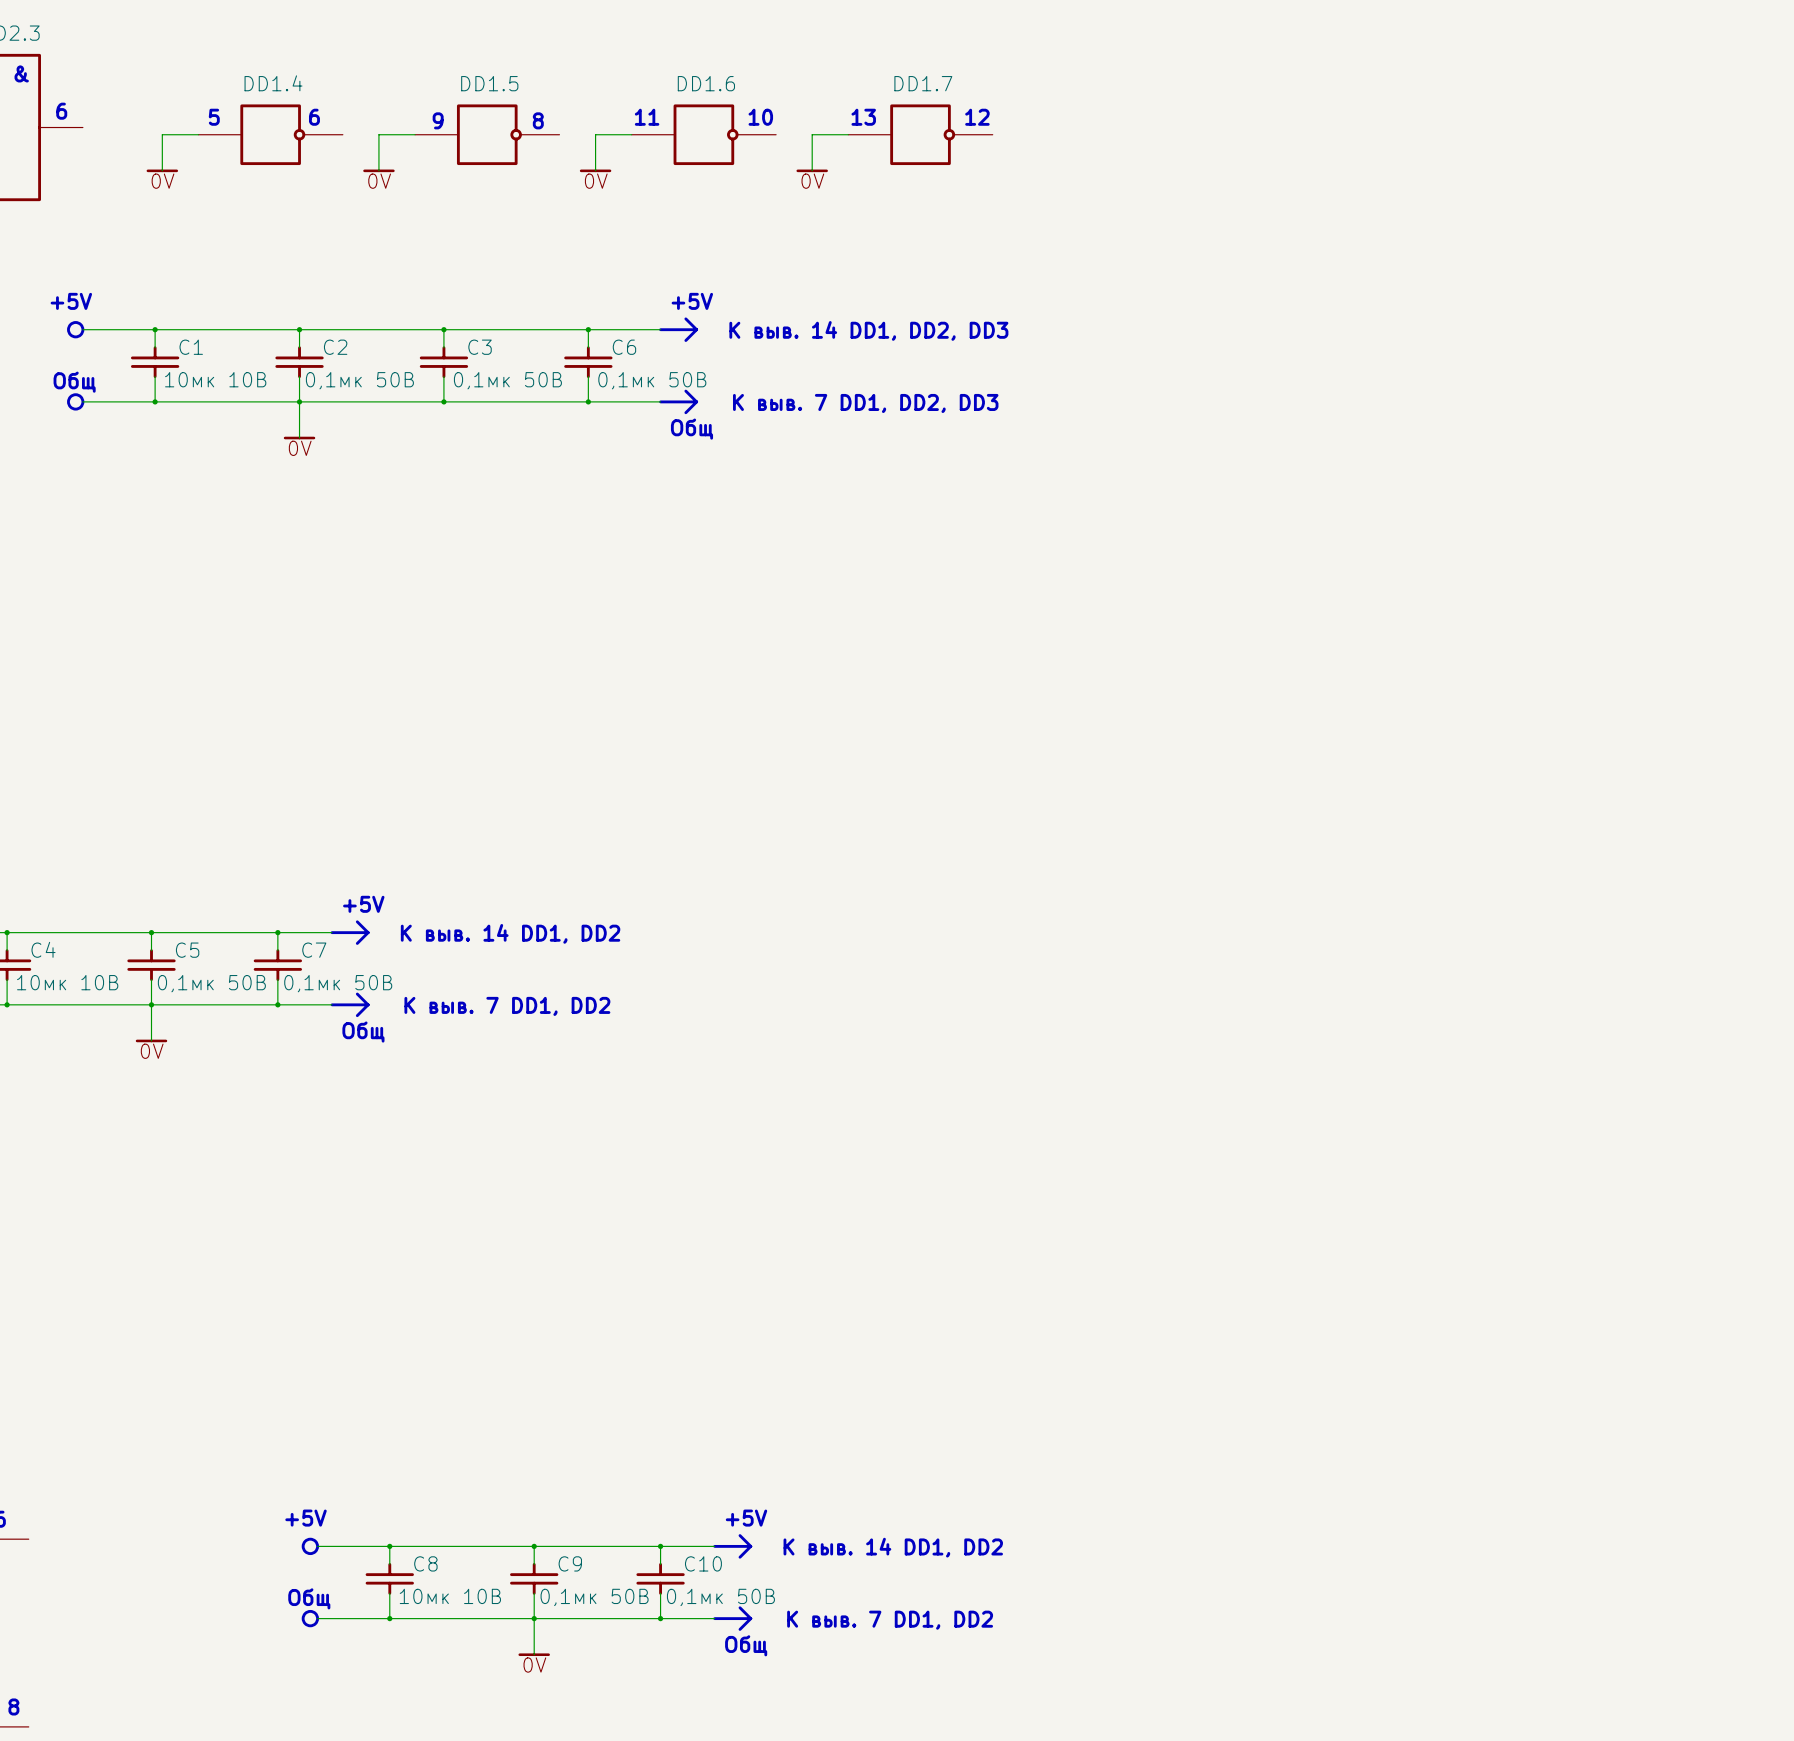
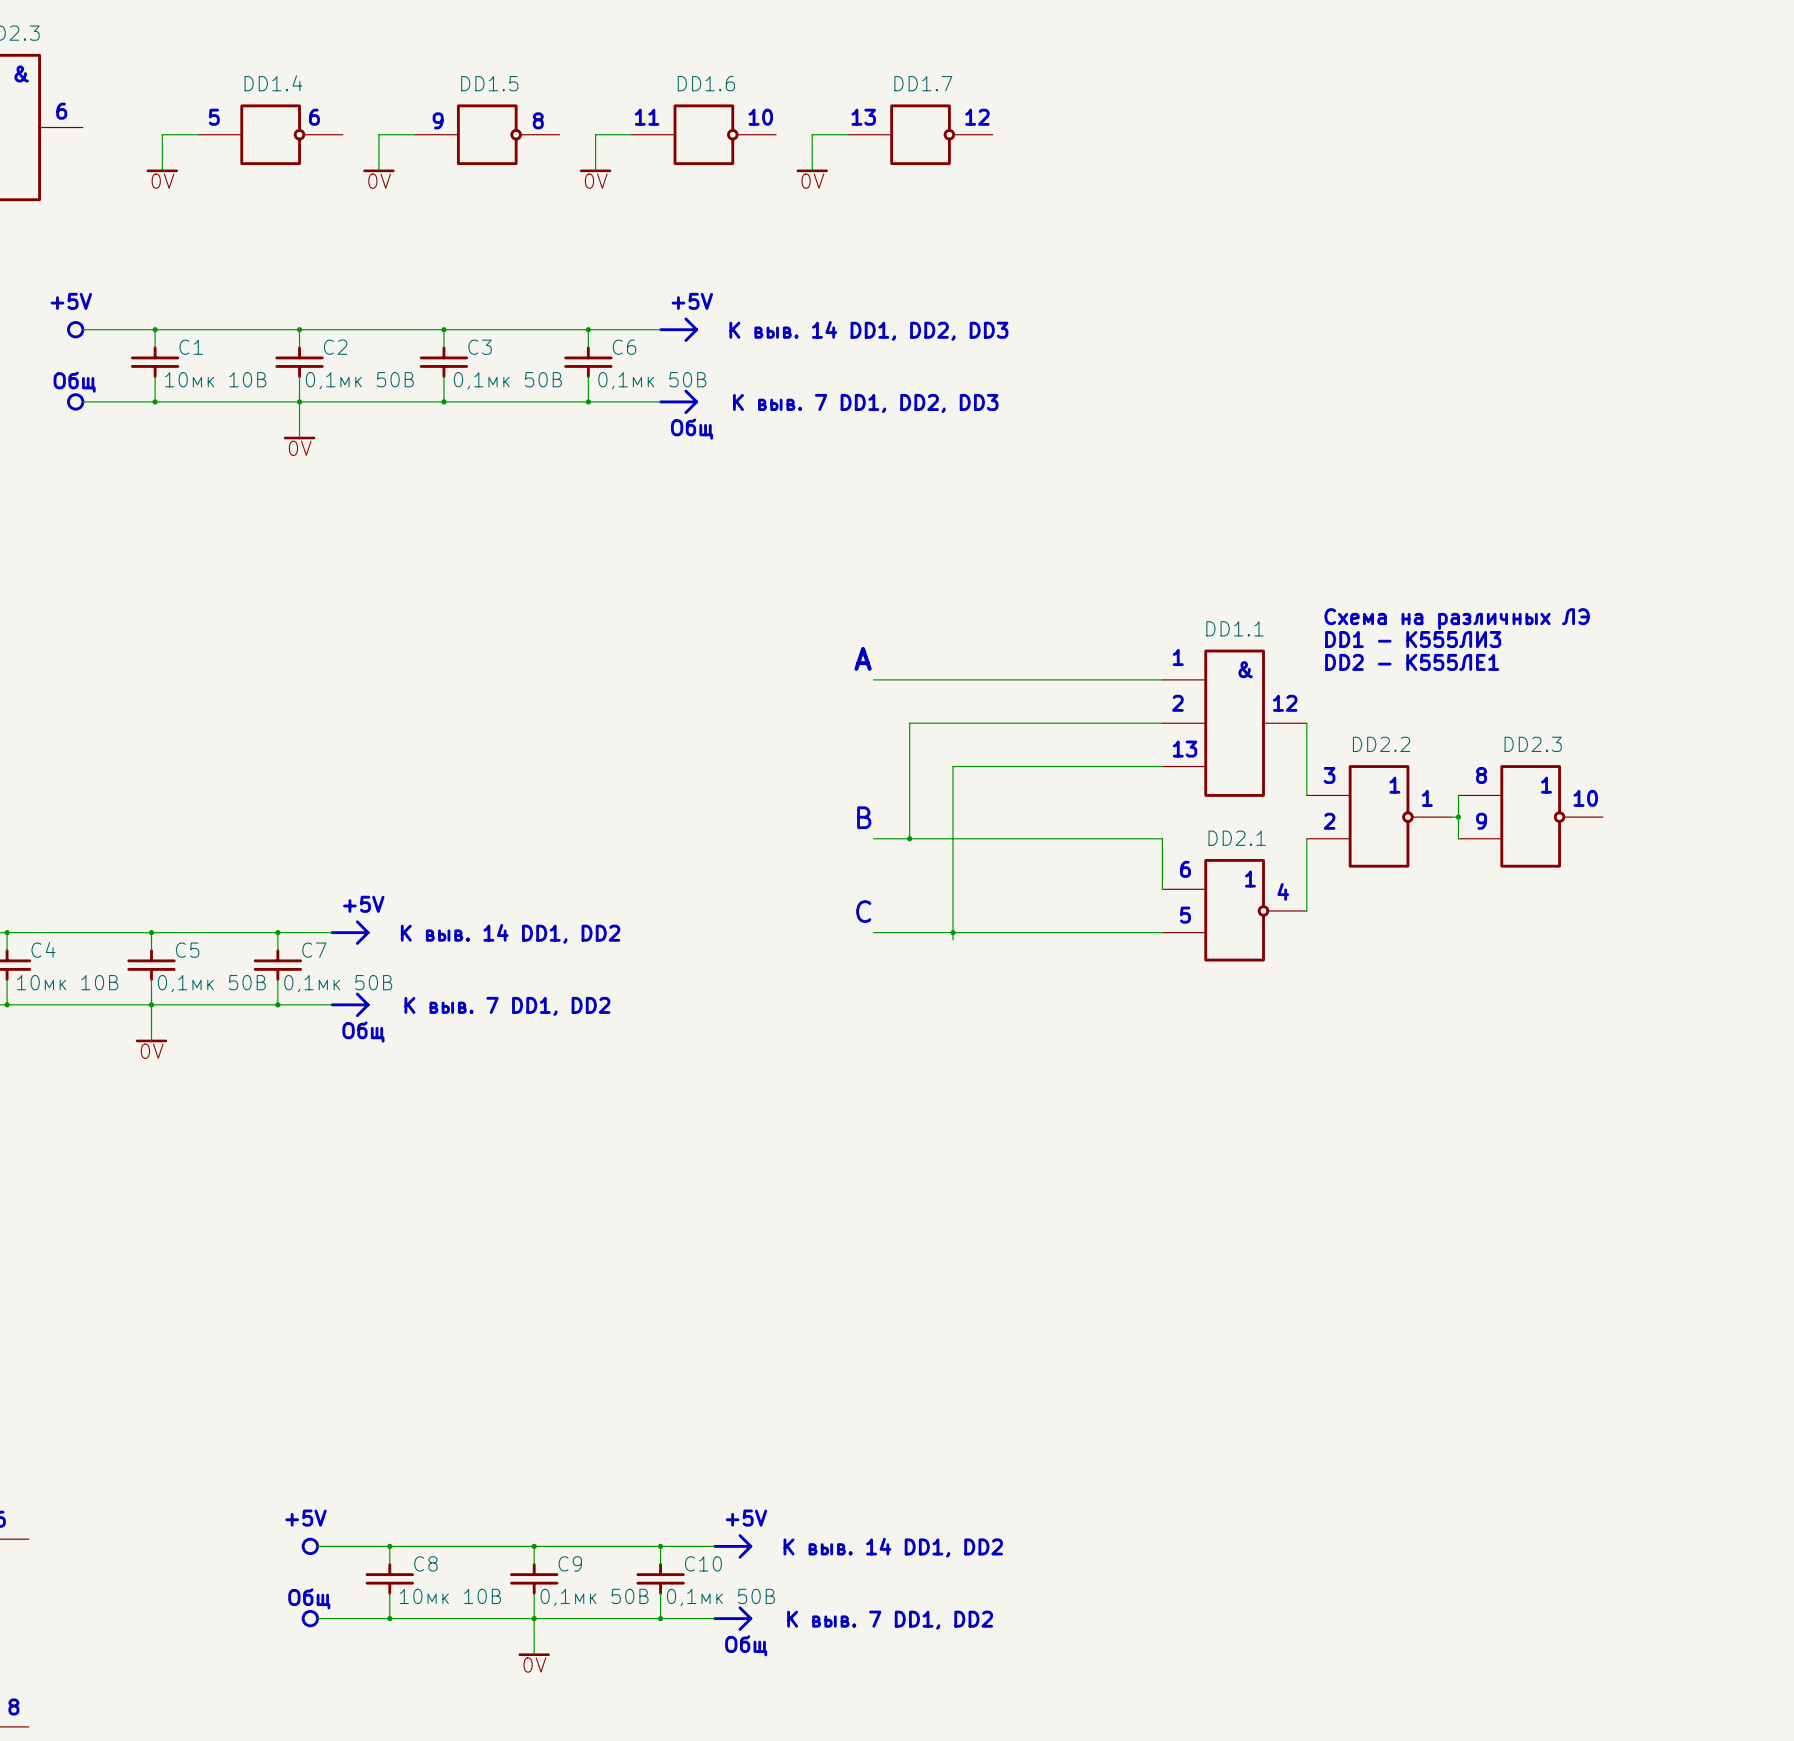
text: none -> Схема на различных ЛЭ (1457, 619)
text: none -> DD1 - К555ЛИ3 (1413, 639)
text: none -> 1 (1178, 657)
text: none -> A (863, 658)
text: none -> DD2 - К555ЛЕ1 (1412, 662)
text: none -> & (1245, 669)
wire: none -> (873, 679) (1162, 679)
text: none -> 2 12 (1234, 703)
wire: none -> (1162, 723) (909, 723) (909, 838)
DD1.1: none -> (1234, 723)
wire: none -> (1306, 723) (1306, 795)
text: none -> 13 (1185, 749)
wire: none -> (1162, 766) (953, 766) (953, 939)
text: none -> 3 (1329, 775)
text: none -> 8 (1481, 775)
text: none -> 1 (1394, 785)
text: none -> 1 (1546, 785)
wire: none -> (1458, 795) (1458, 838)
text: none -> 1 (1427, 798)
text: none -> 10 (1585, 798)
DD2.2: none -> (1379, 816)
DD2.3: none -> (1530, 816)
text: none -> B (864, 817)
wire: none -> (1451, 817) (1458, 817)
junction: none -> (1458, 817)
text: none -> 2 (1329, 821)
text: none -> 9 (1481, 821)
wire: none -> (873, 838) (1162, 838) (1162, 889)
junction: none -> (909, 838)
wire: none -> (1306, 838) (1306, 910)
text: none -> 6 (1185, 869)
text: none -> 1 (1250, 879)
text: none -> 4 (1283, 891)
DD2.1: none -> (1234, 910)
text: none -> C (863, 911)
text: none -> 5 (1185, 915)
wire: none -> (873, 932) (1162, 932)
junction: none -> (953, 932)

